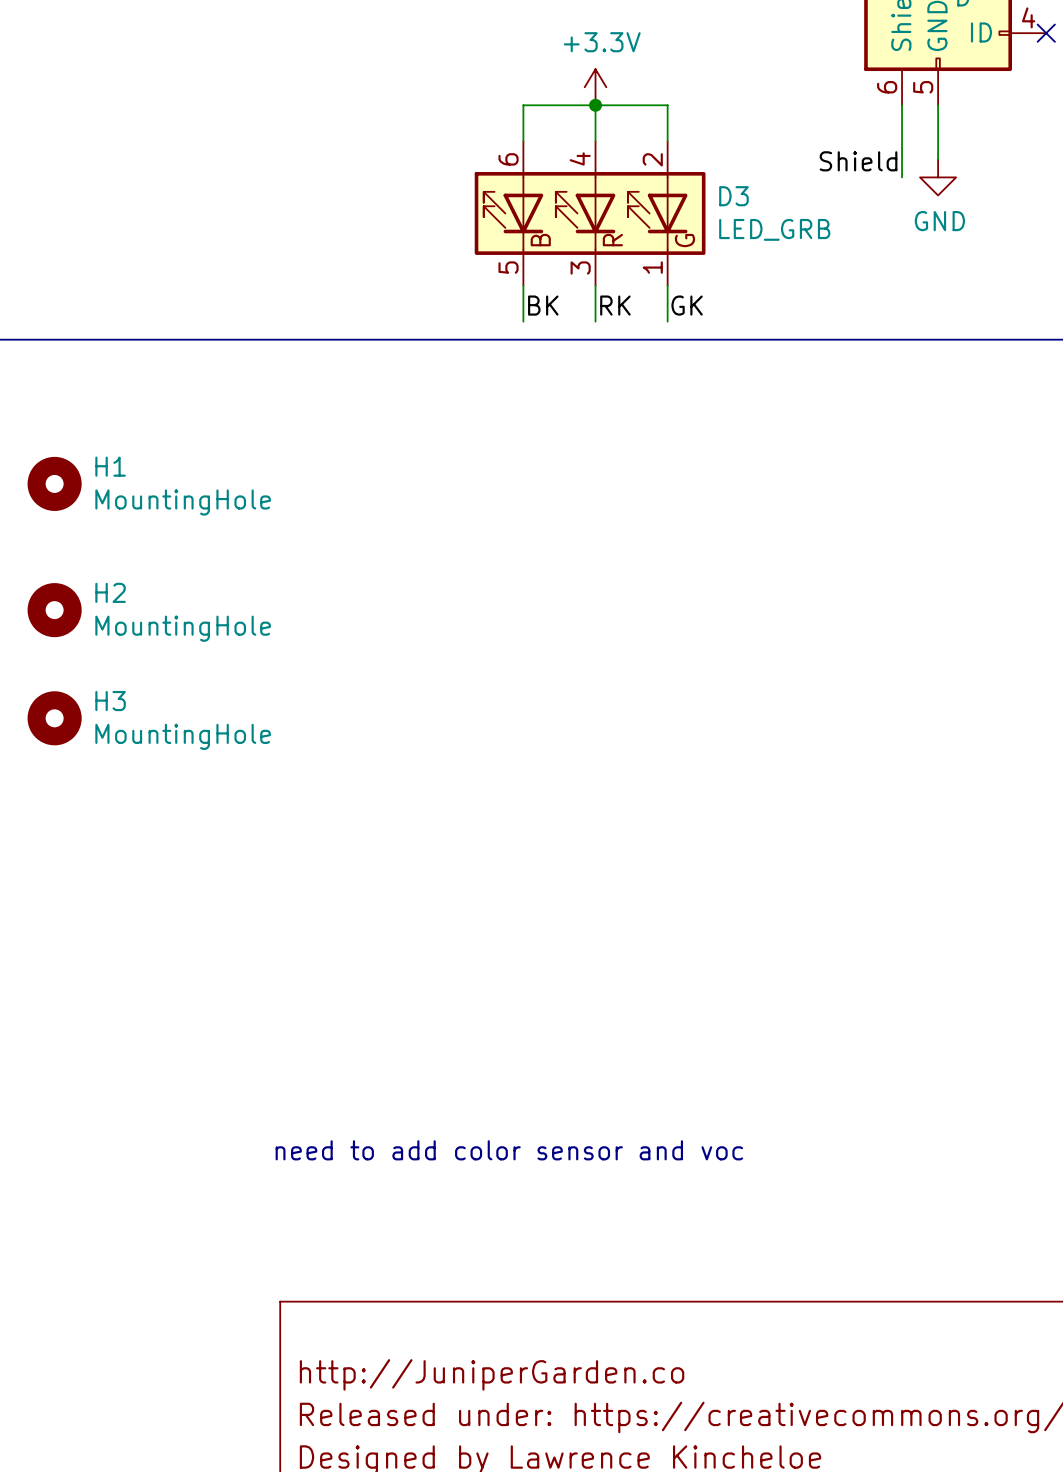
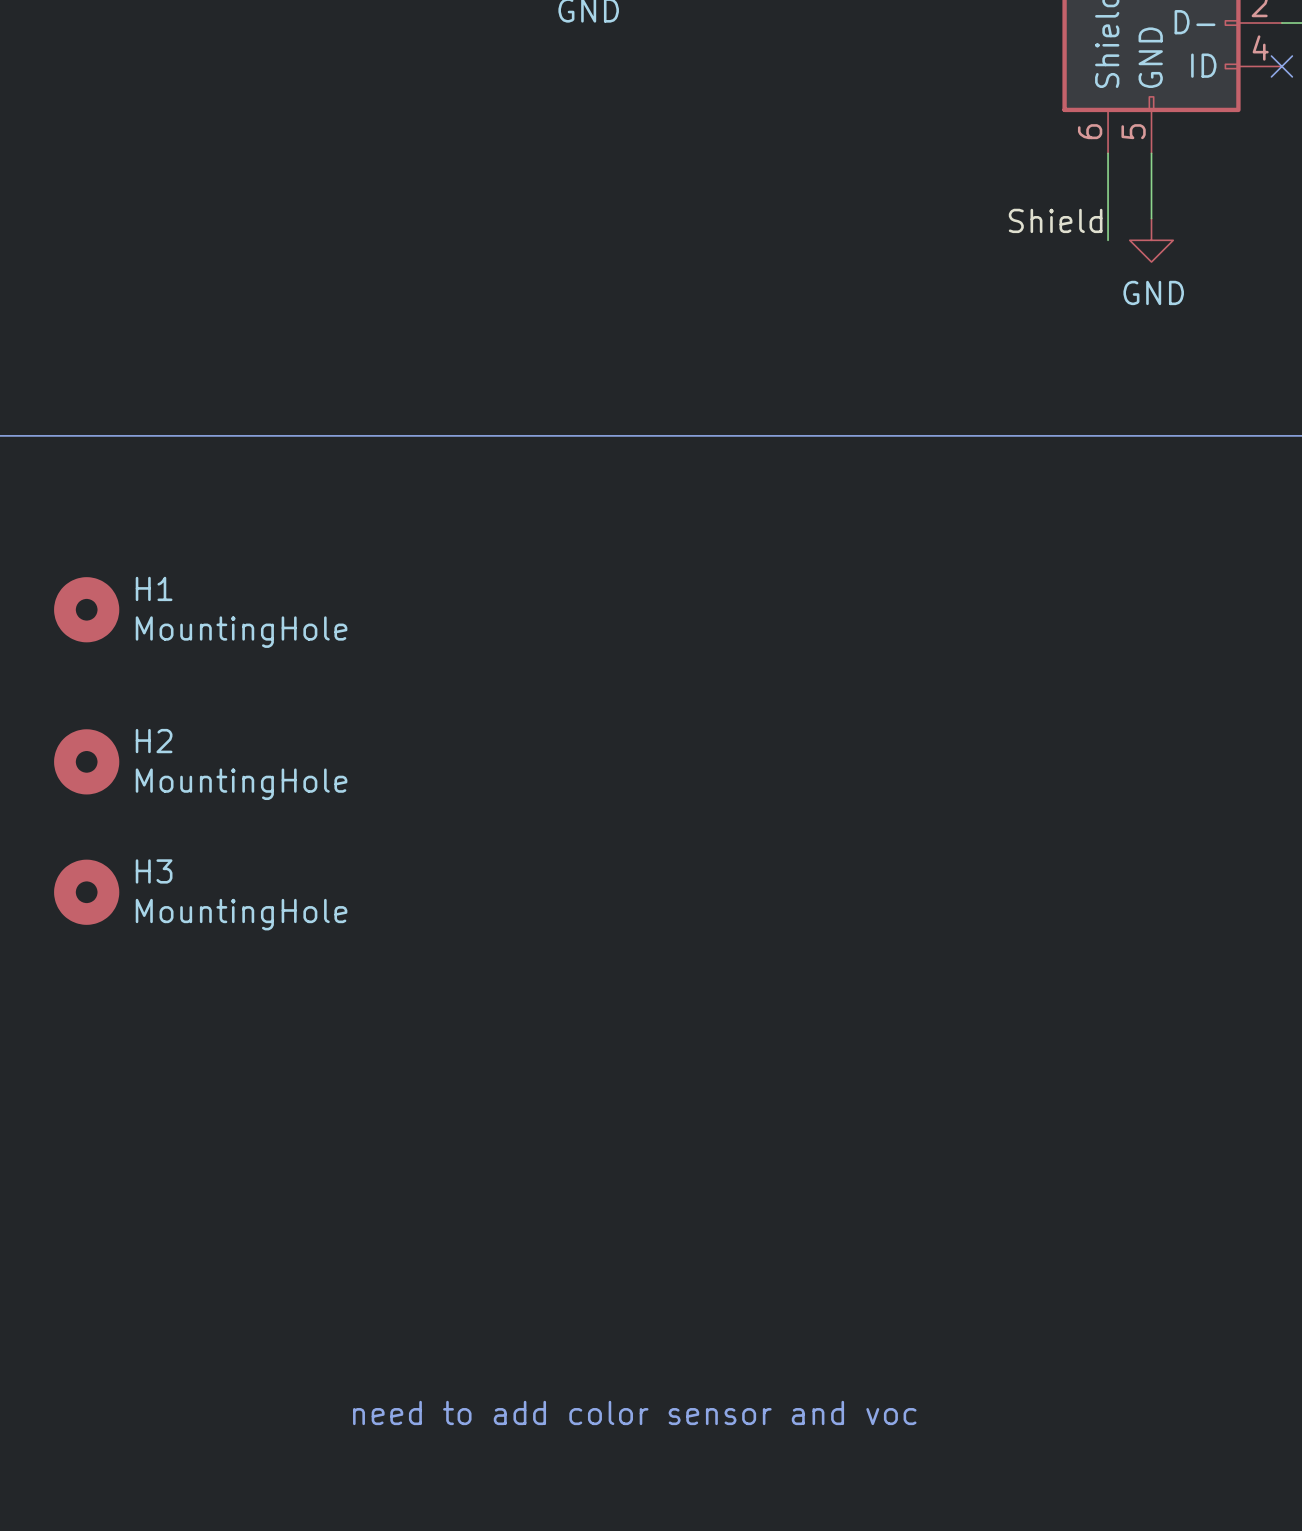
power symbol: +3.3V (595, 87) -> none
wire: (595, 105) (595, 141) -> none
junction: (595, 105) -> none
wire: (523, 141) (523, 105) (667, 105) (667, 141) -> none
D3: LED_GRB (590, 213) -> none
wire: (523, 285) (523, 321) -> none
wire: (595, 285) (595, 321) -> none
wire: (667, 285) (667, 321) -> none
label: BK (543, 305) -> none
label: RK (615, 305) -> none
label: GK (687, 305) -> none

